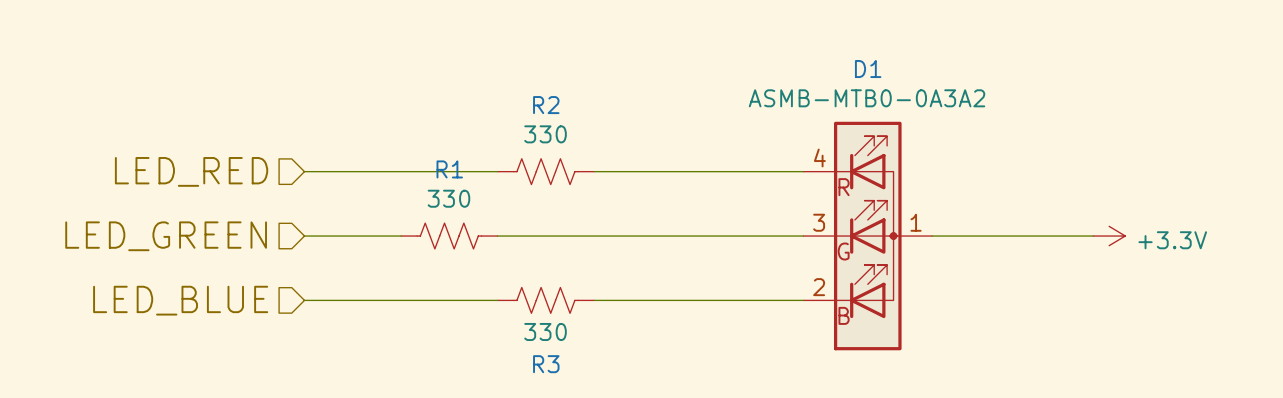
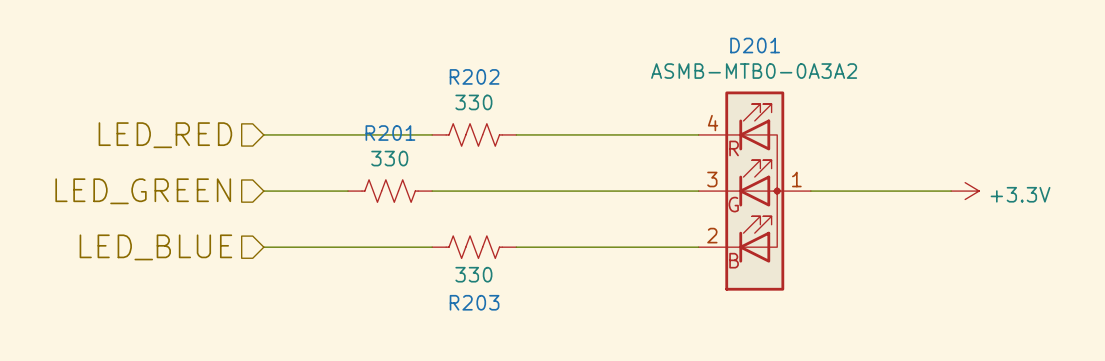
D1 name: D1 (868, 69) -> D201 (755, 45)
R2 name: R2 (546, 105) -> R202 (474, 76)
R1 name: R1 (449, 169) -> R201 (390, 133)
R3 name: R3 (546, 364) -> R203 (474, 302)

